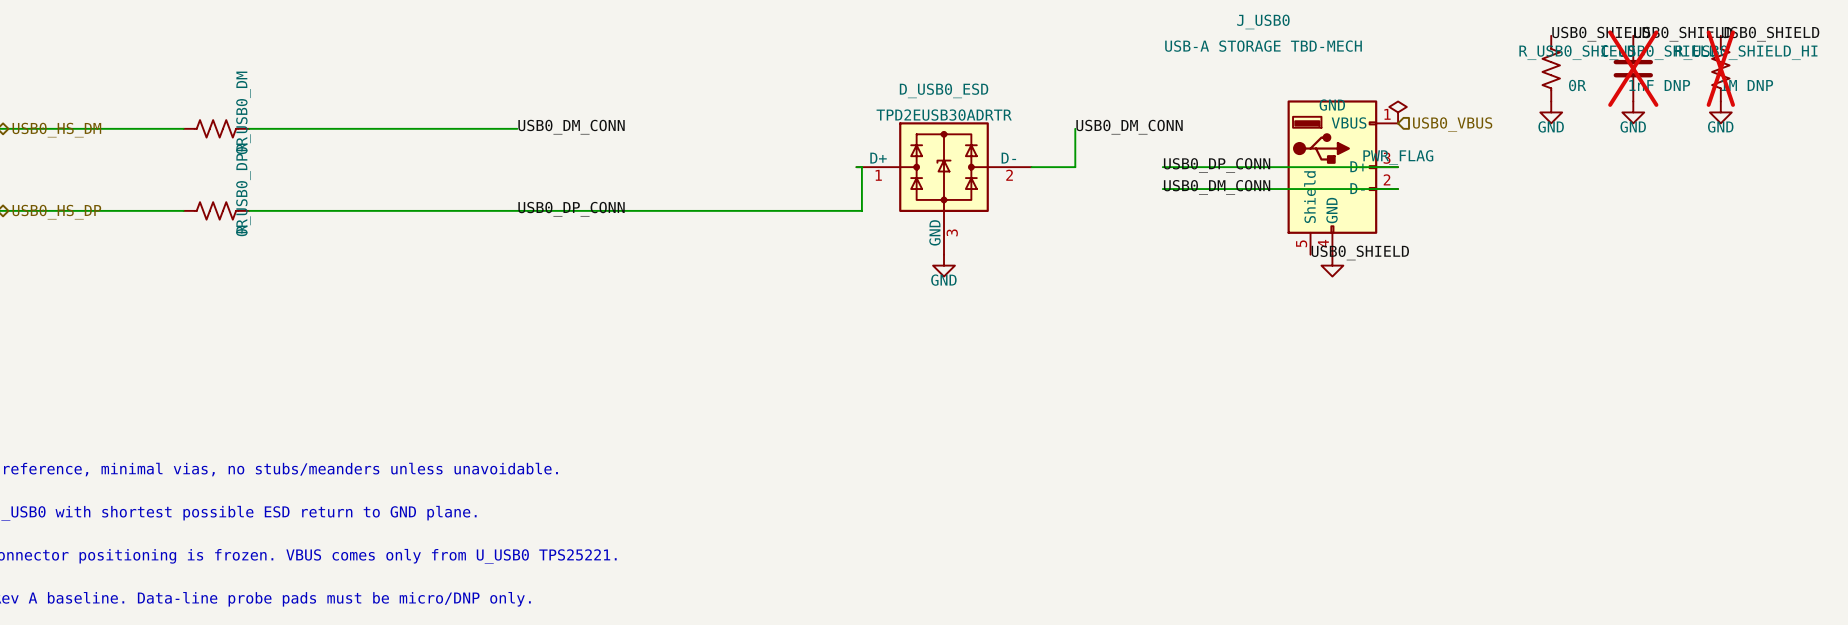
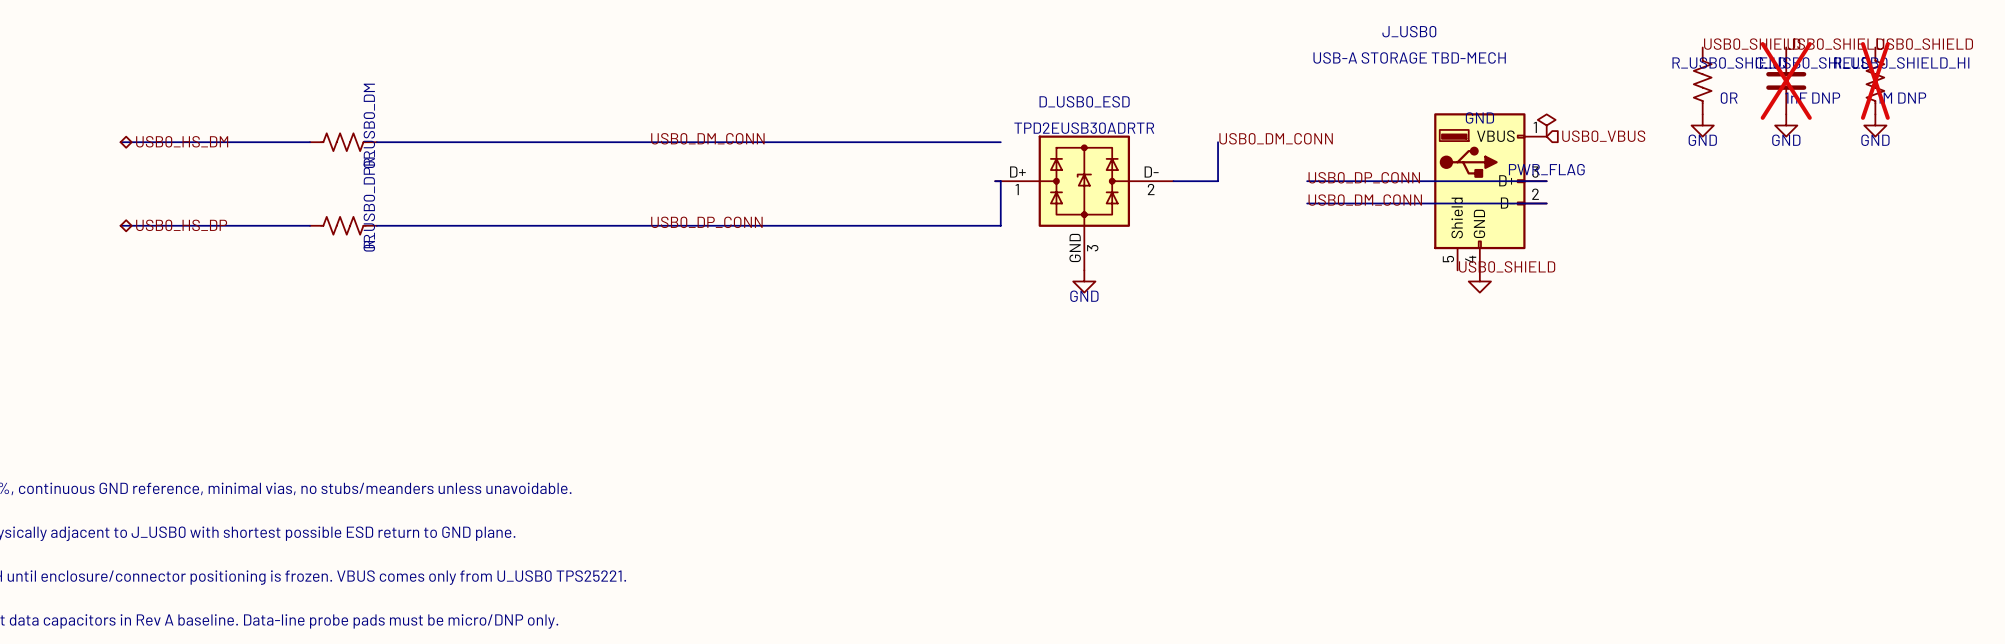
wire: none -> (649, 142) (1000, 142)

